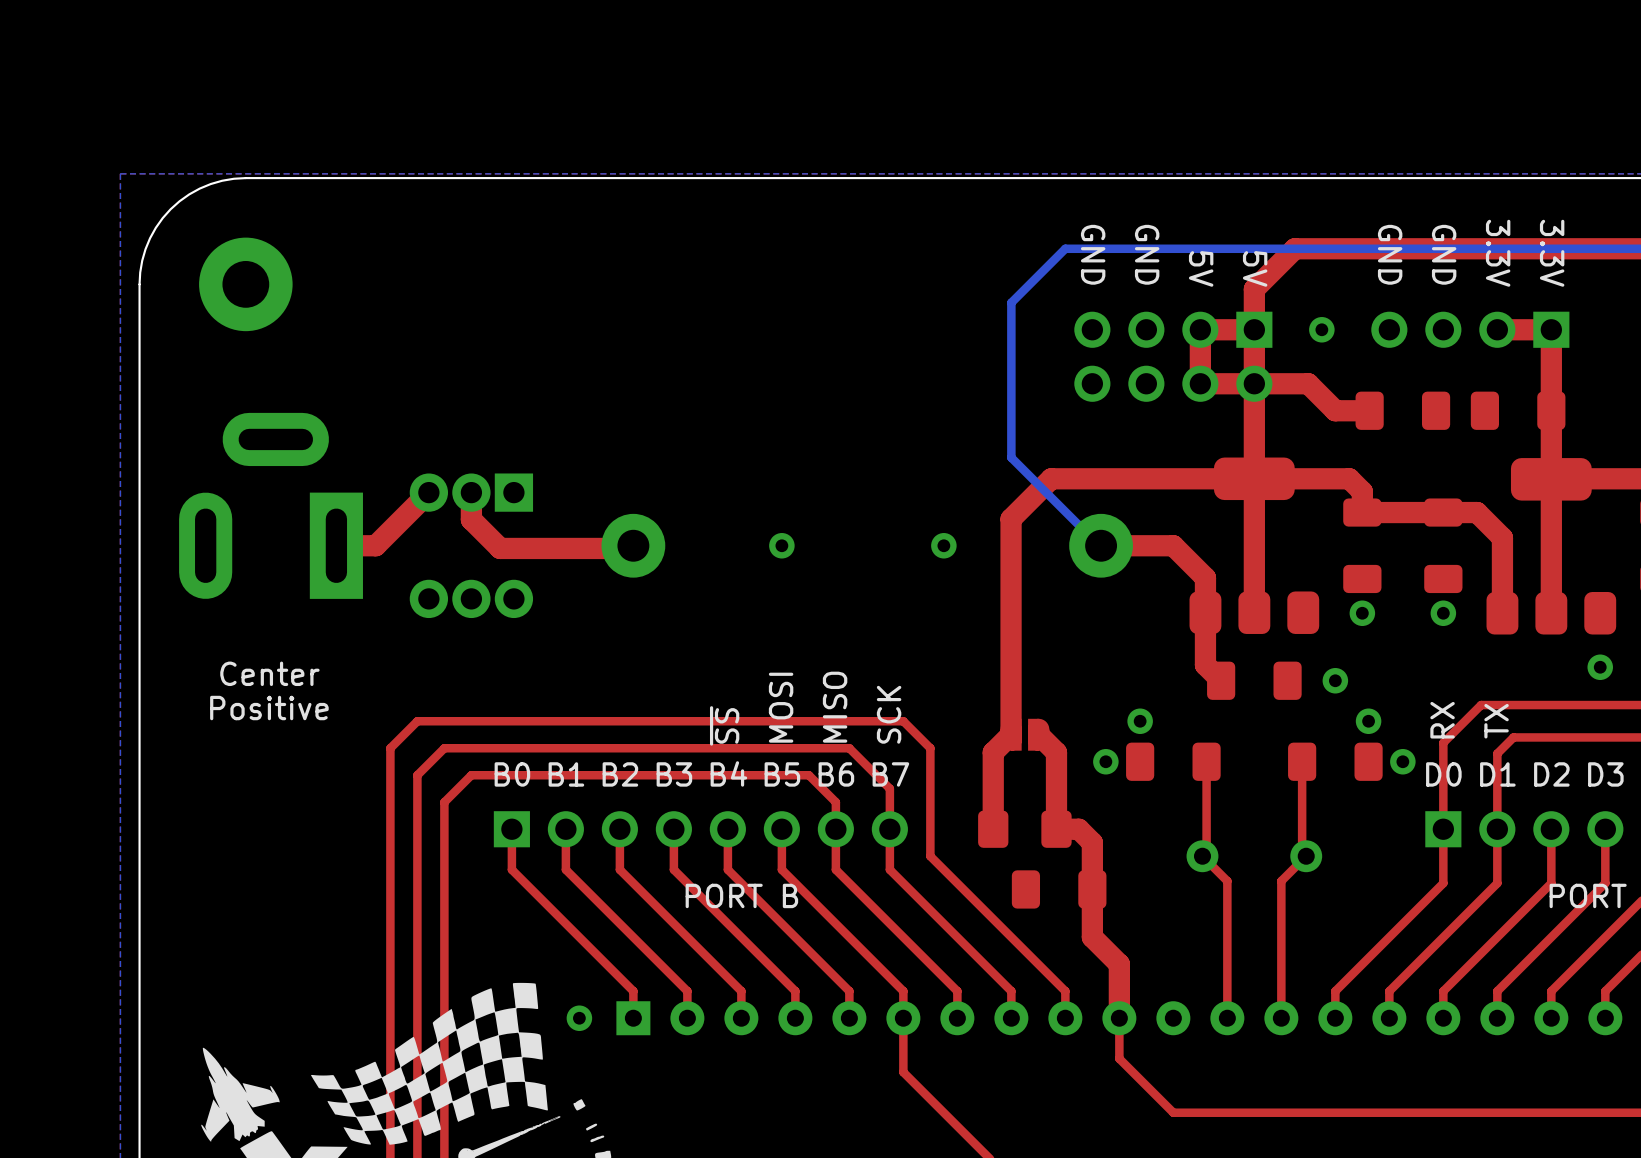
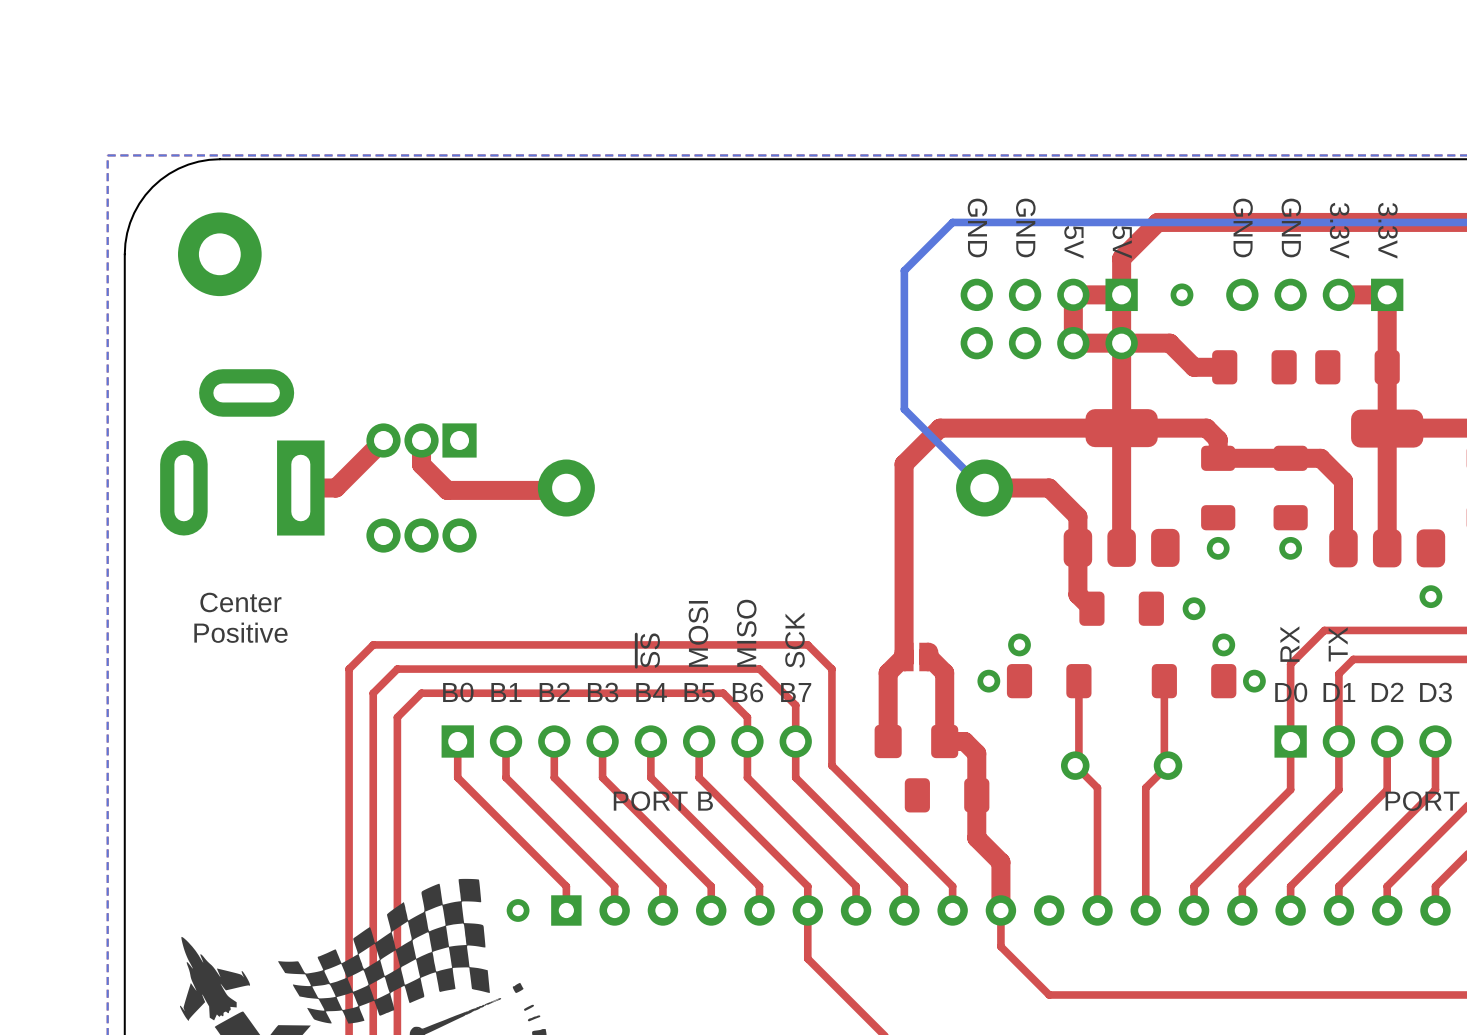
via: (781, 545) -> none
via: (943, 545) -> none

